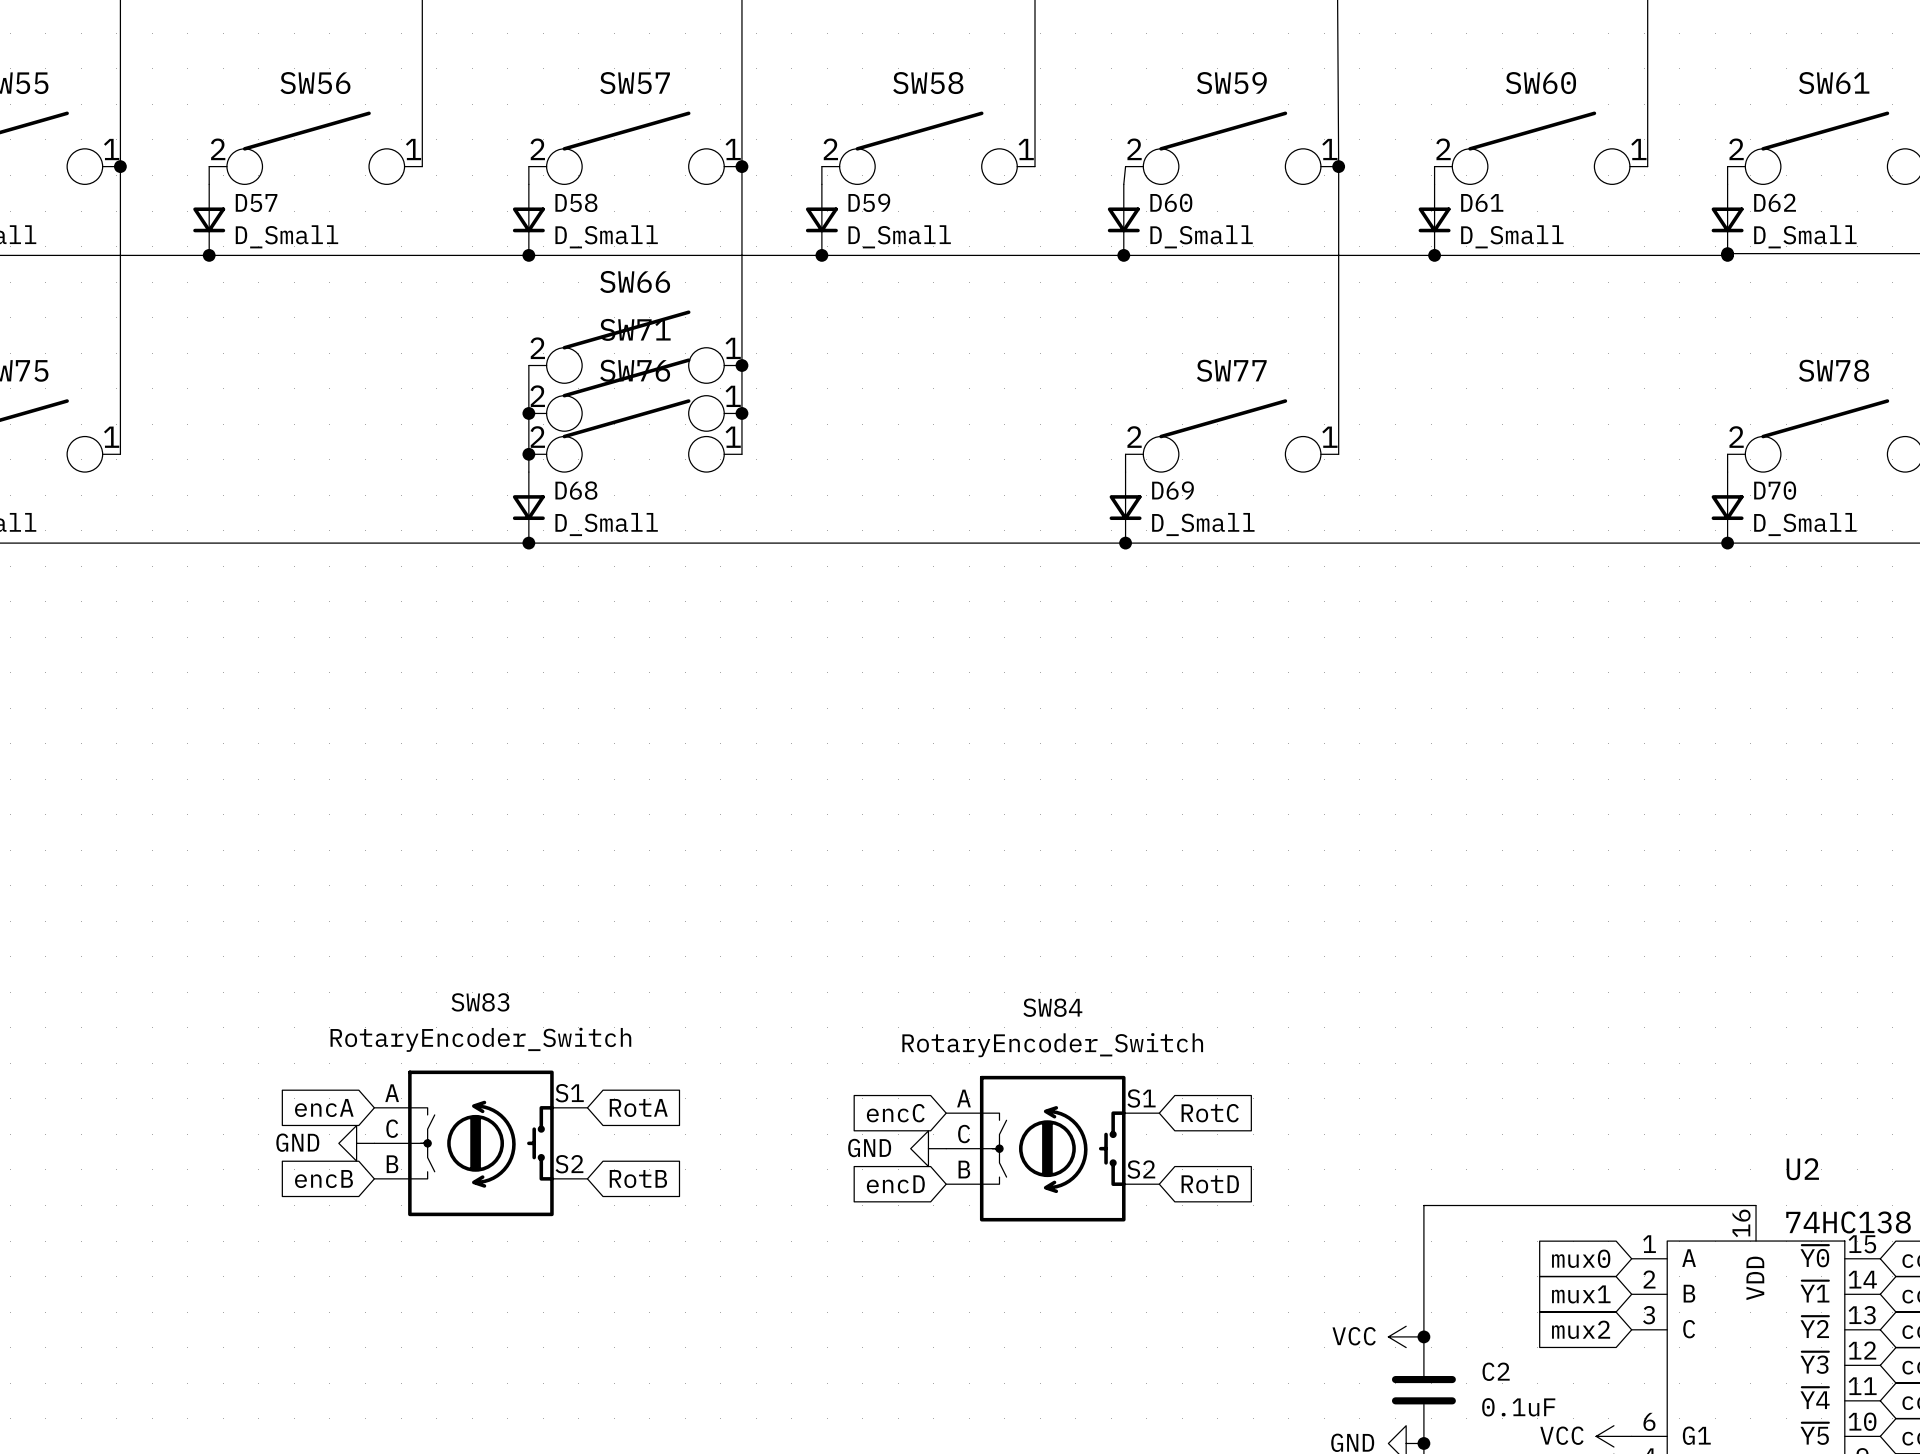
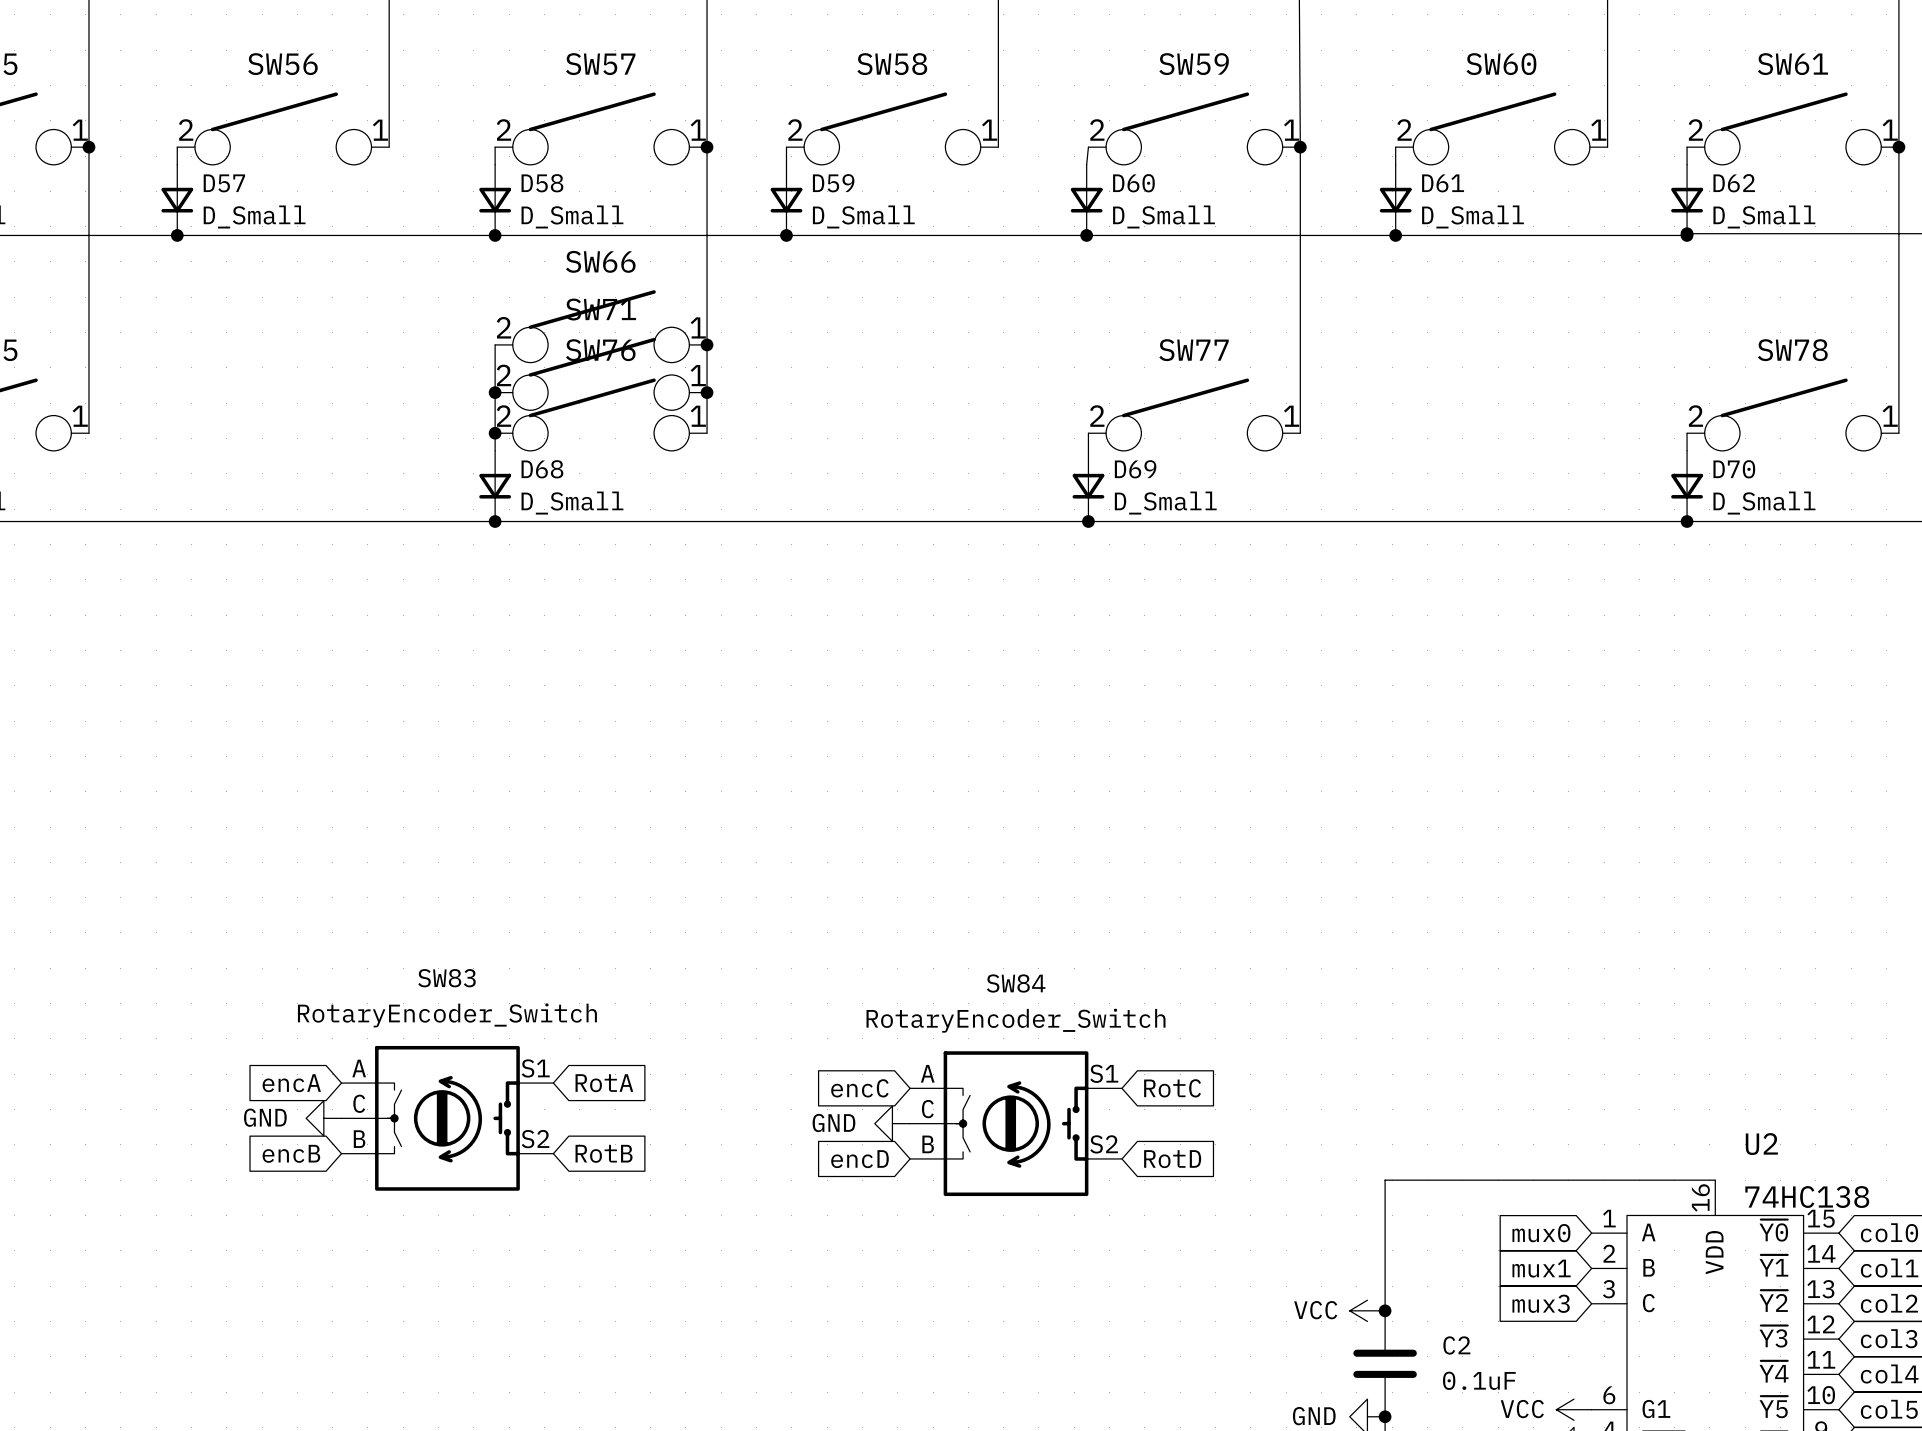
global label: mux2 (1581, 1329) -> mux3 (1541, 1303)

